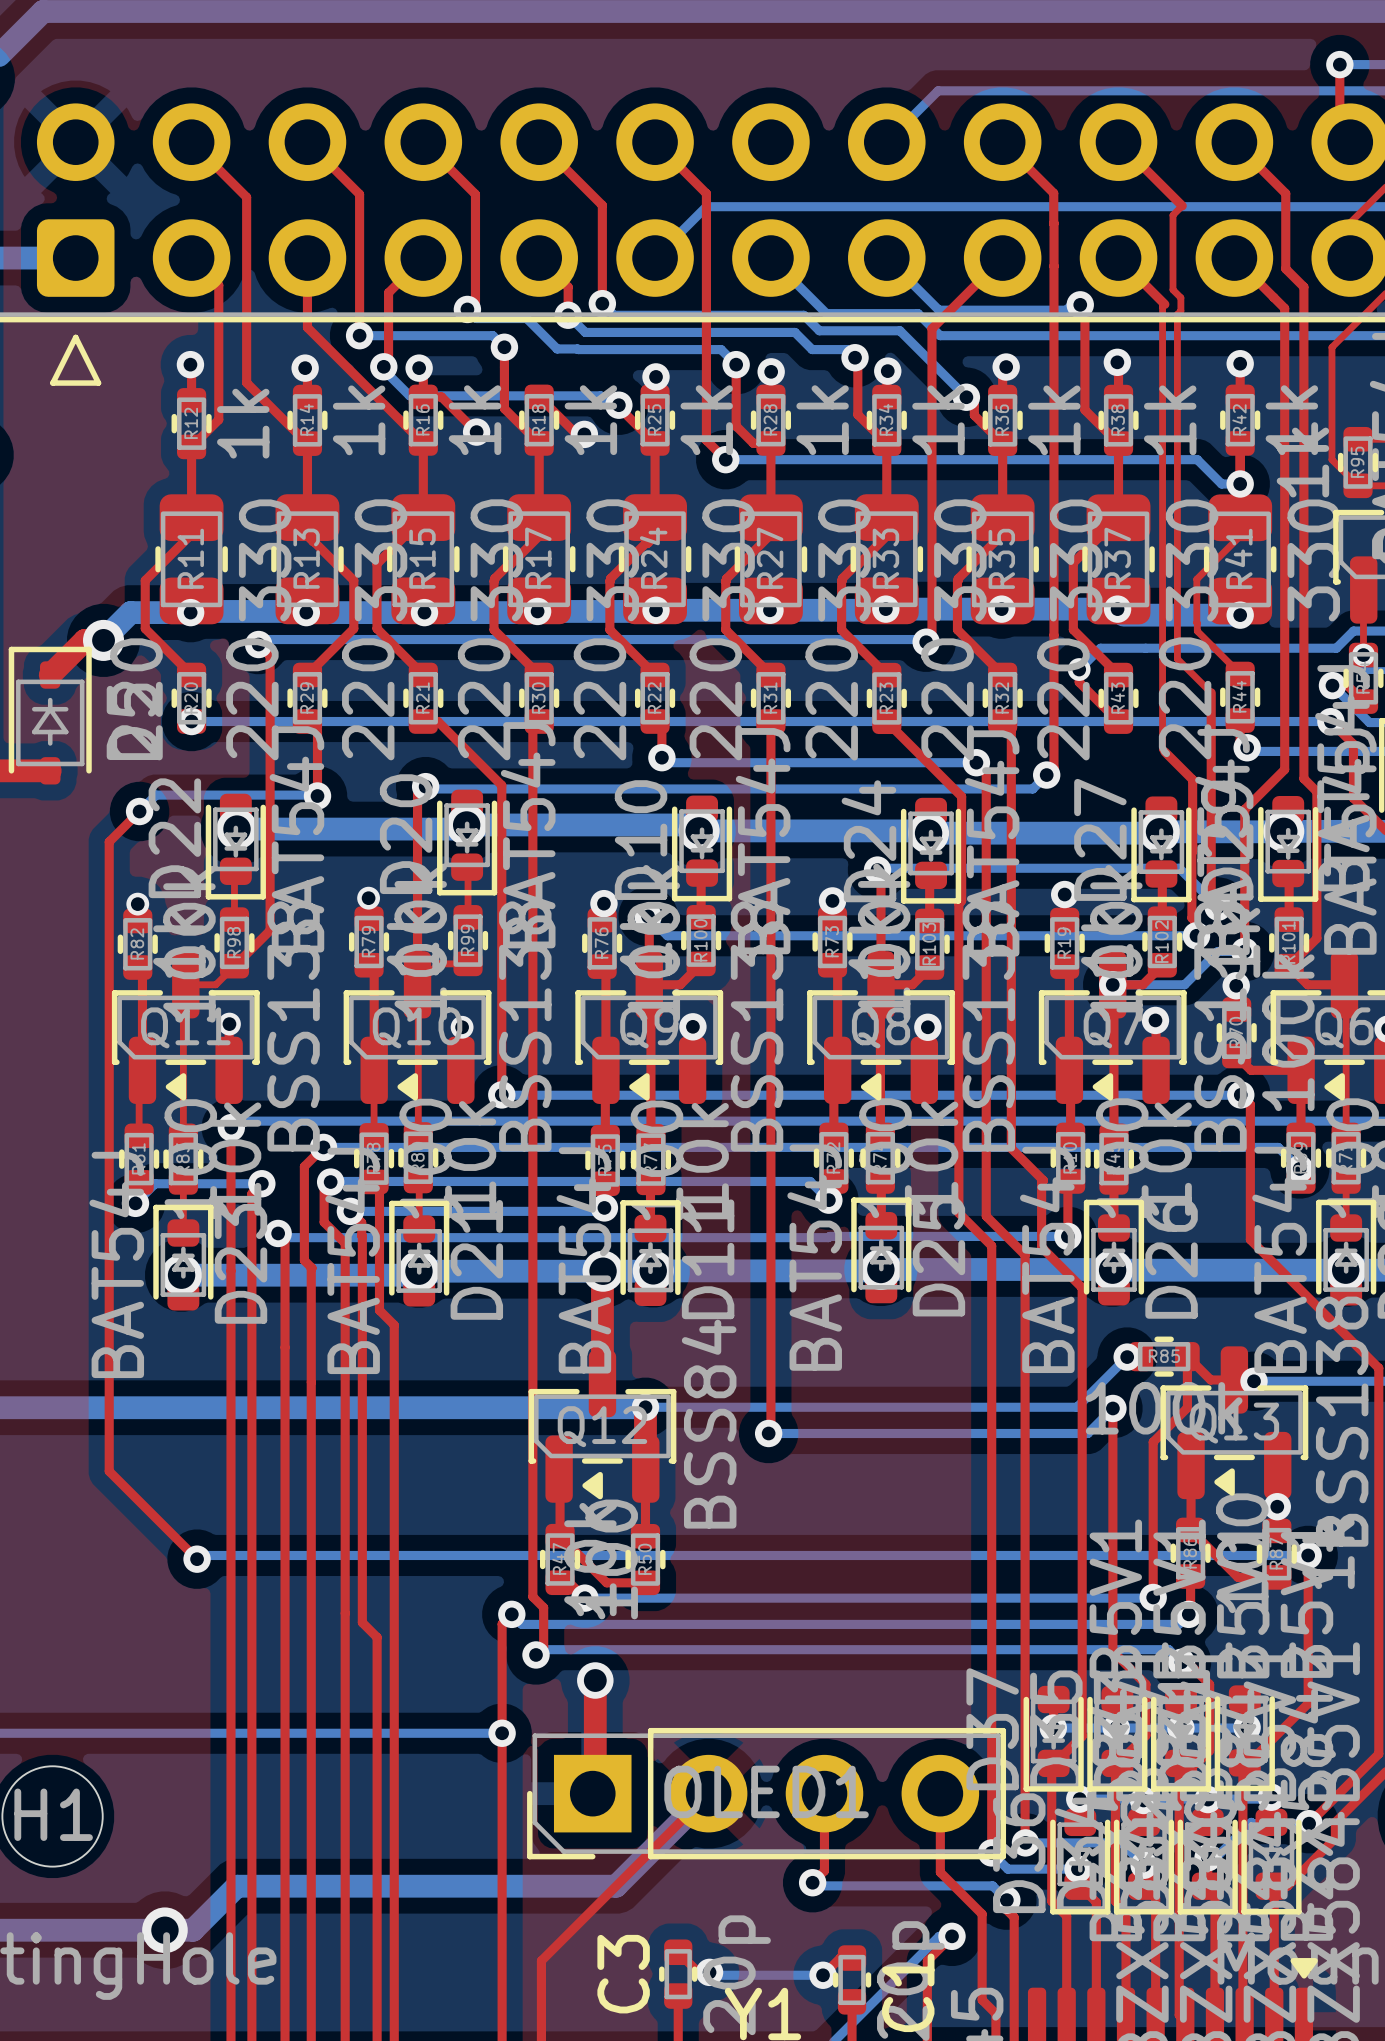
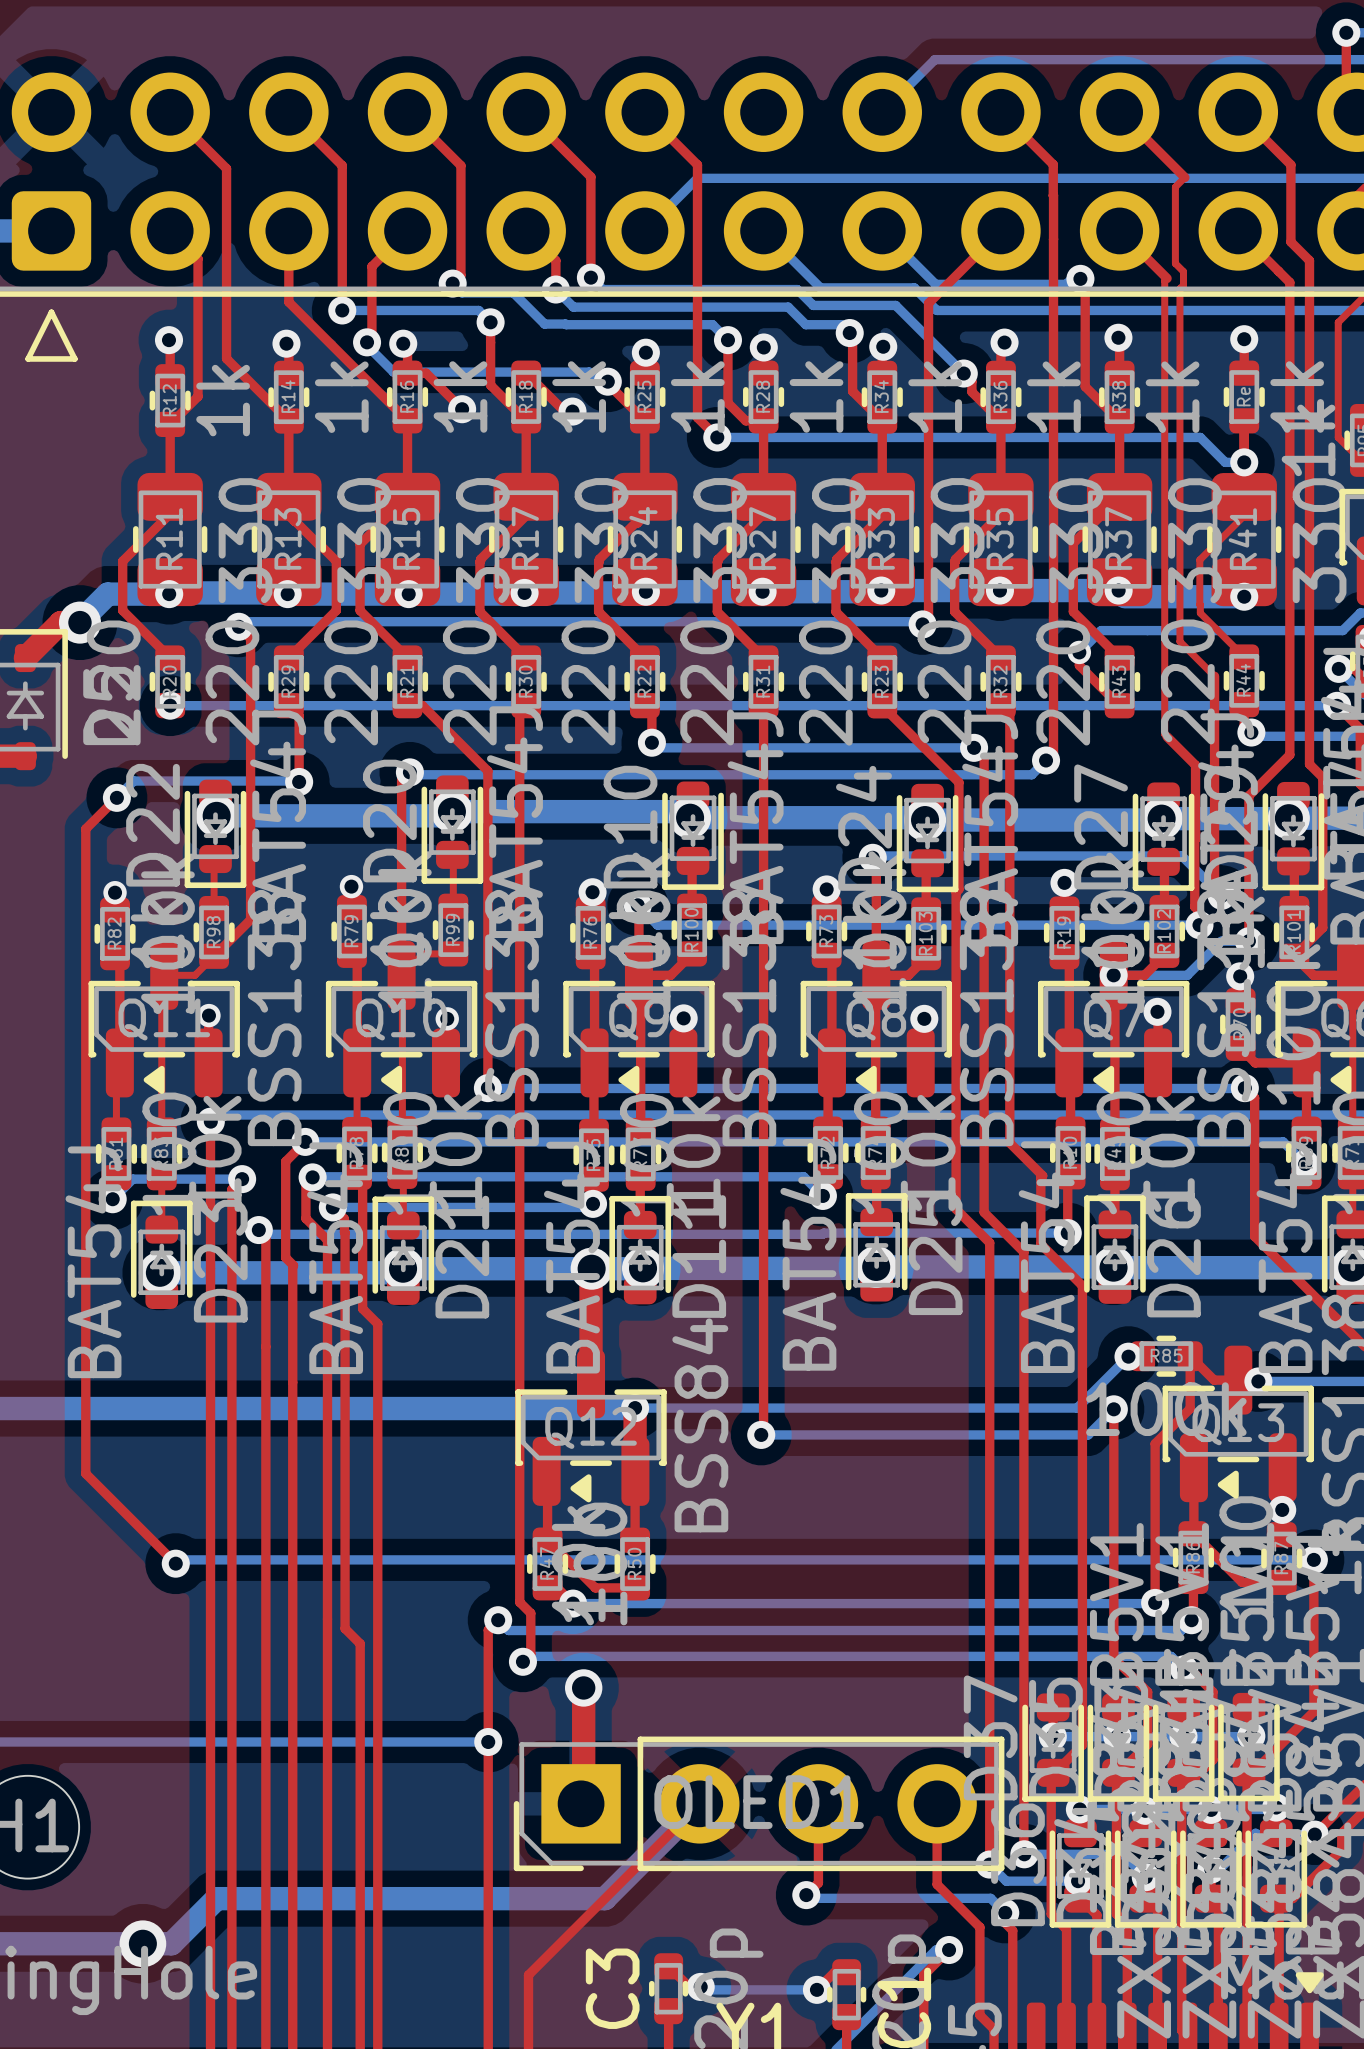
R42 name: R42 (1239, 419) -> Re (1243, 396)

